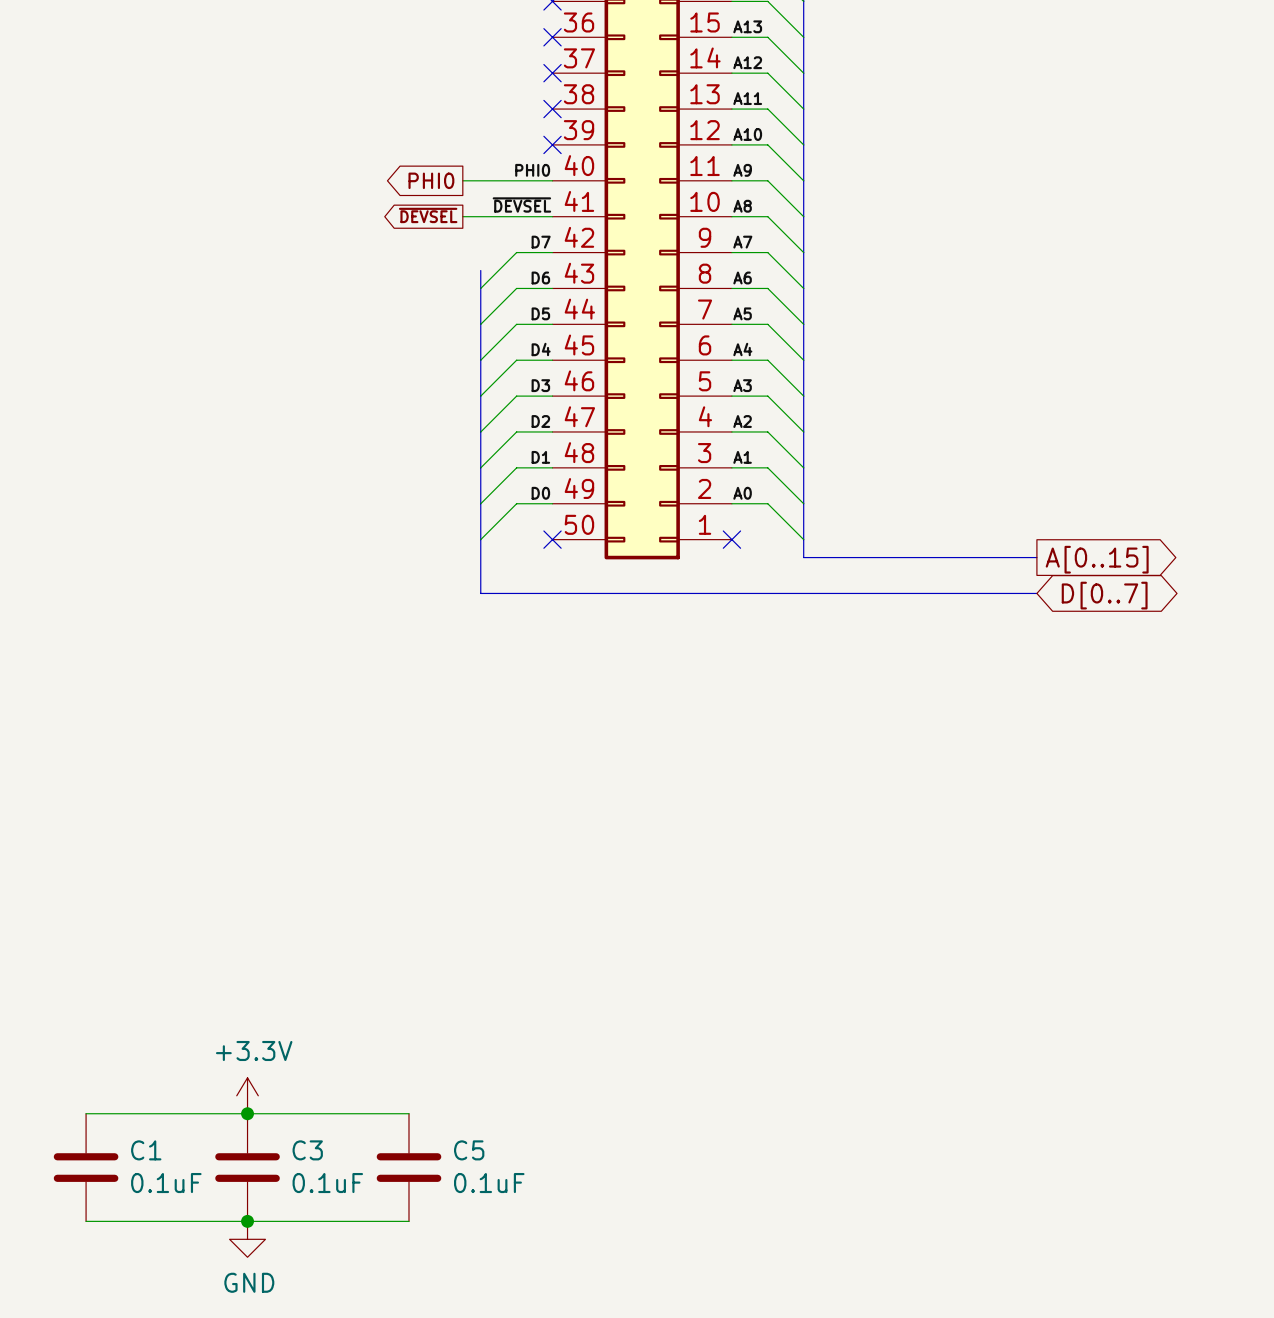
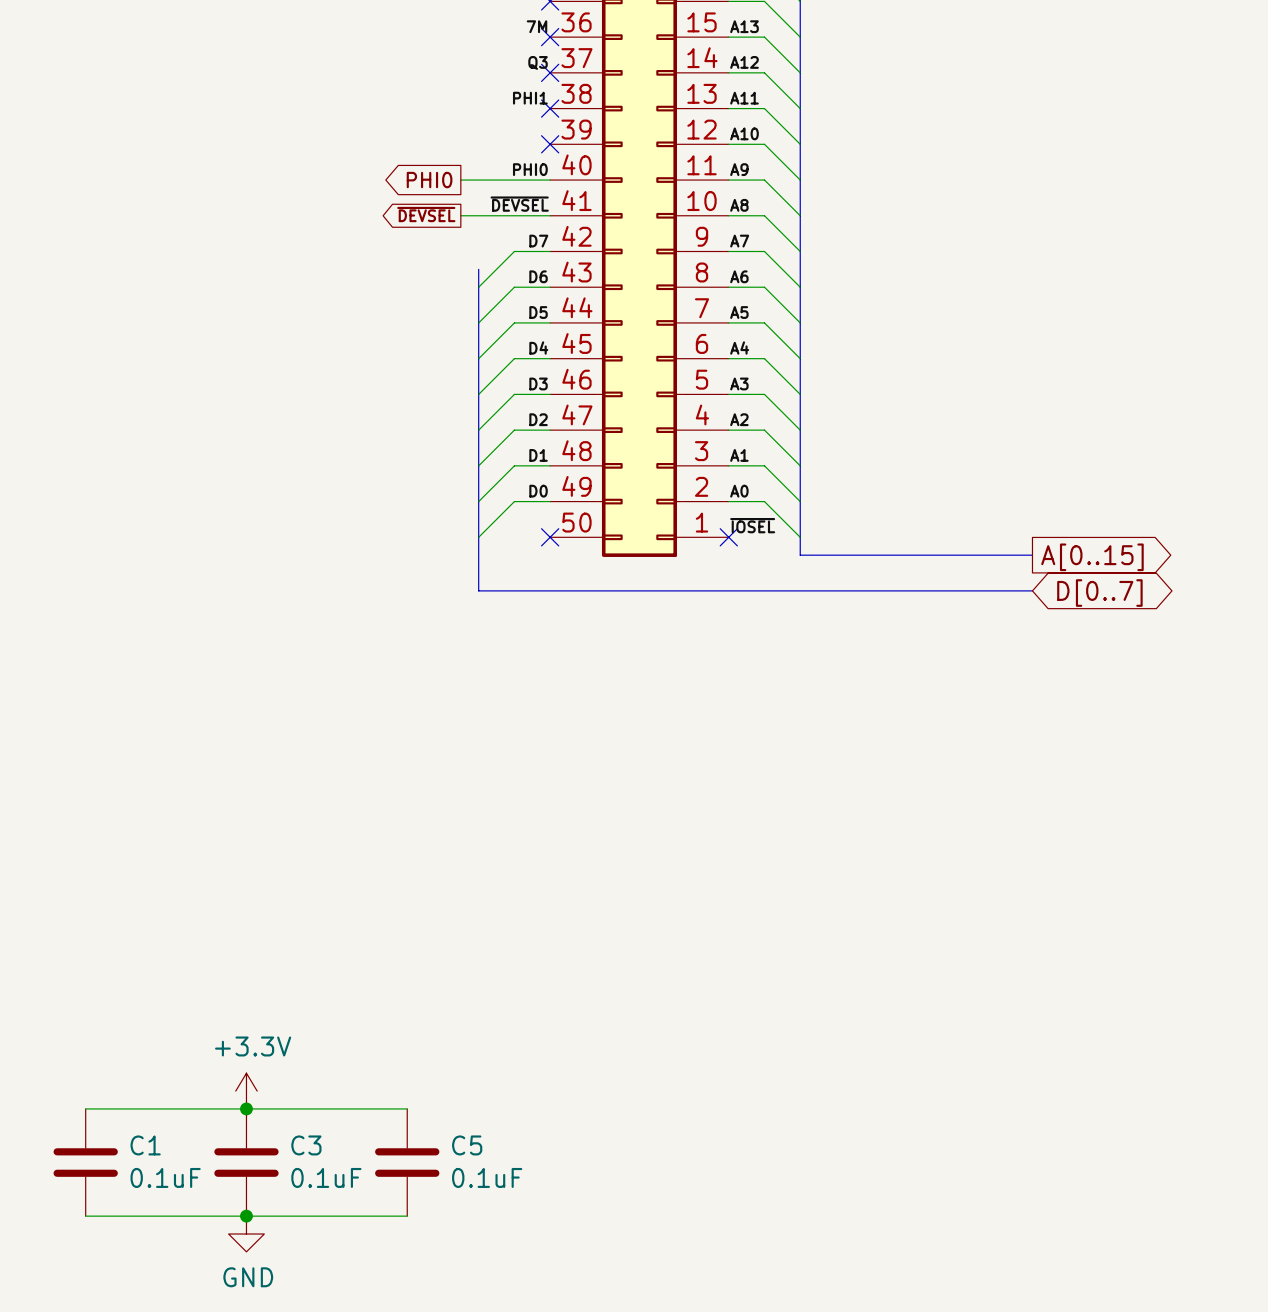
label: none -> 7M (537, 26)
label: none -> Q3 (538, 62)
label: none -> PHI1 (530, 98)
label: none -> ~{IOSEL} (752, 525)

